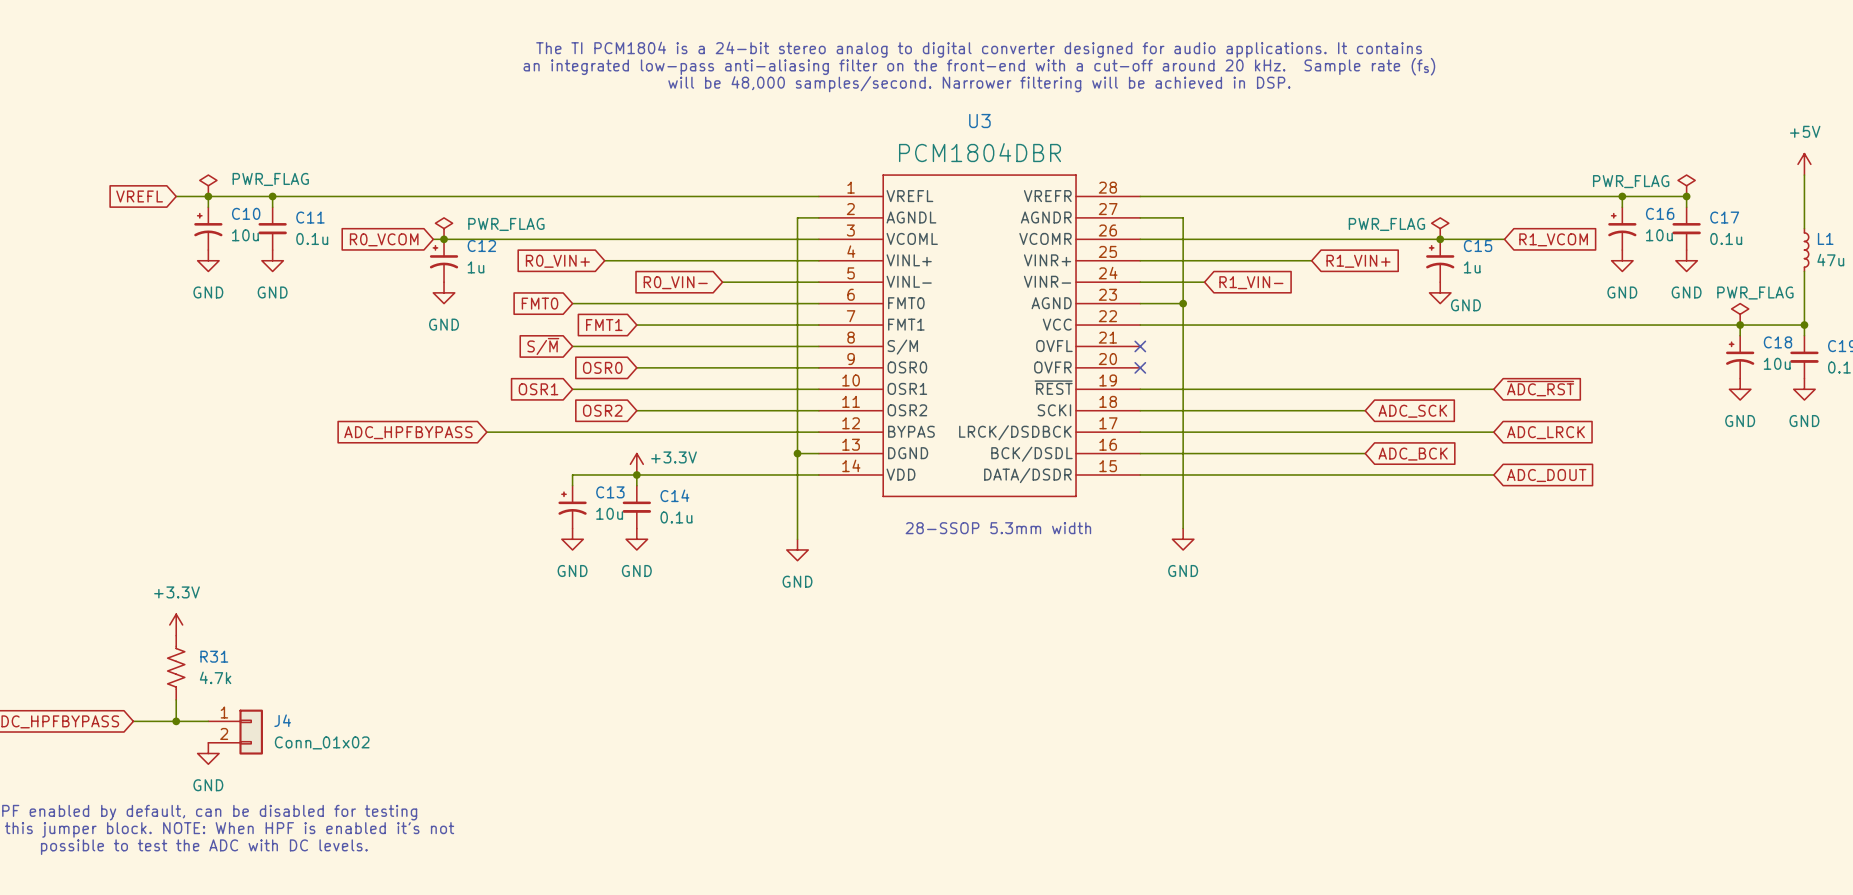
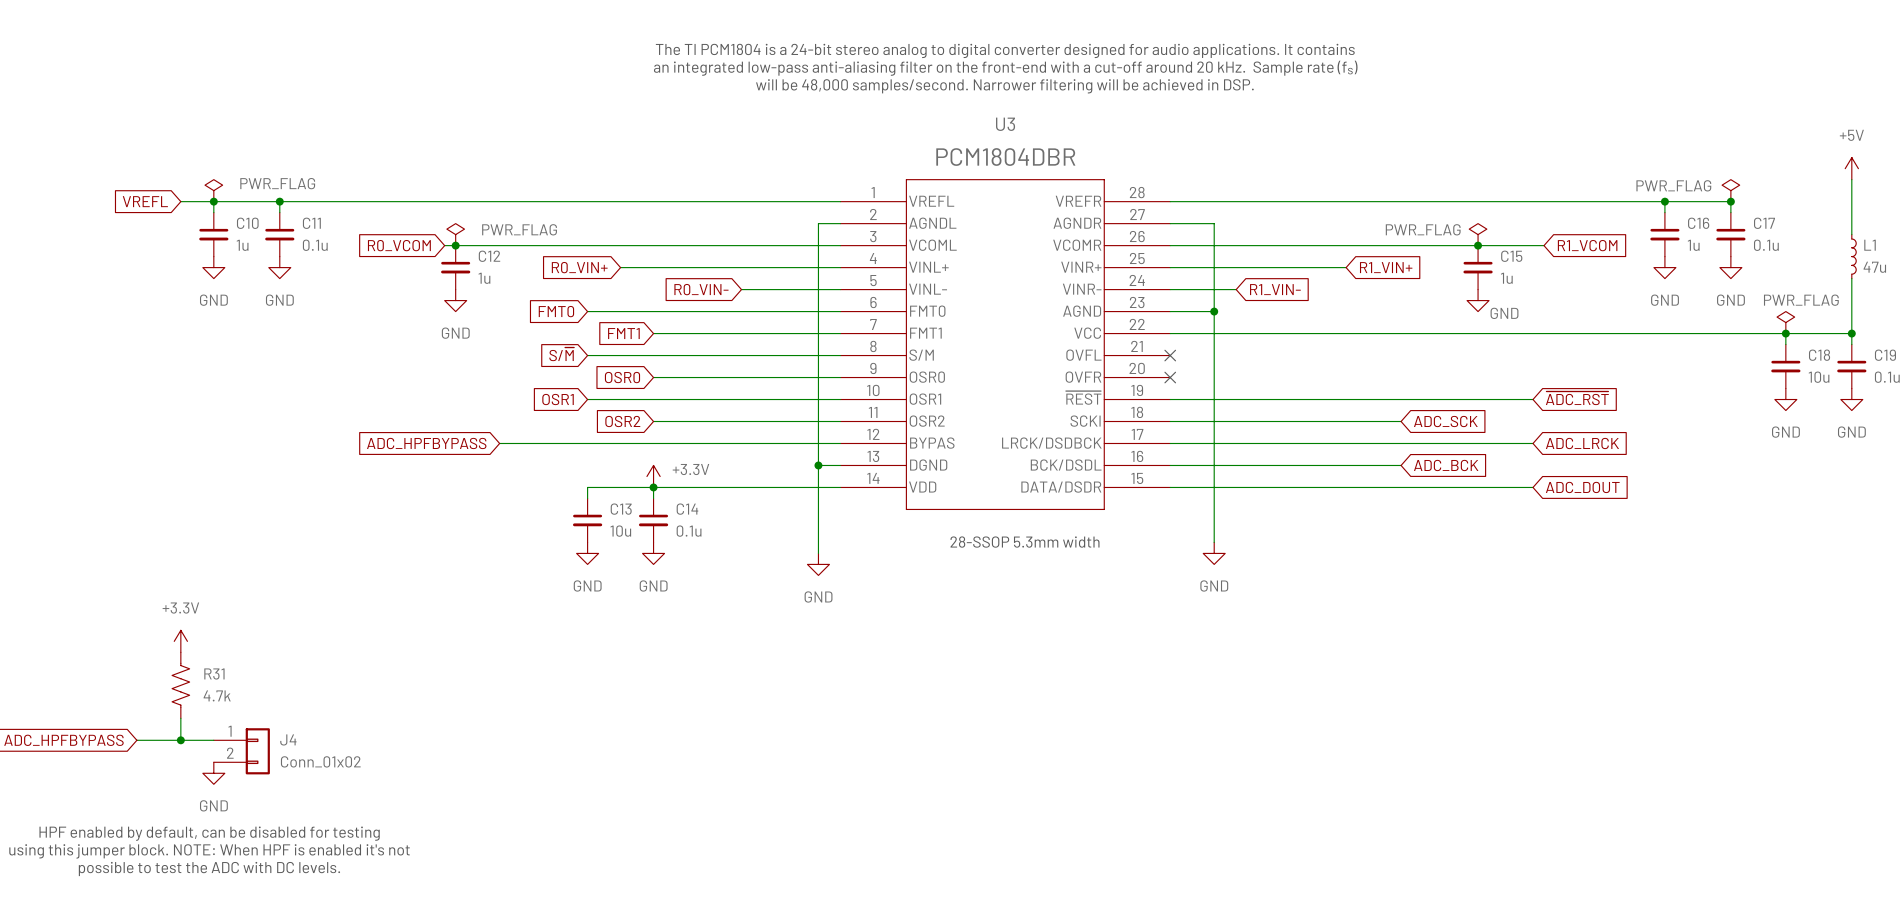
C10 symbol: [194, 207, 223, 251] -> [199, 212, 229, 257]
C16 symbol: [1608, 207, 1637, 251] -> [1650, 212, 1680, 257]
C10 value: 10u (245, 235) -> 1u (242, 245)
C16 value: 10u (1659, 235) -> 1u (1693, 245)
C12 symbol: [429, 239, 459, 283] -> [441, 245, 471, 290]
C15 symbol: [1426, 239, 1455, 283] -> [1463, 245, 1493, 290]
C18 symbol: [1726, 335, 1755, 379] -> [1771, 344, 1801, 389]
C13 symbol: [558, 485, 587, 529] -> [572, 498, 603, 543]

